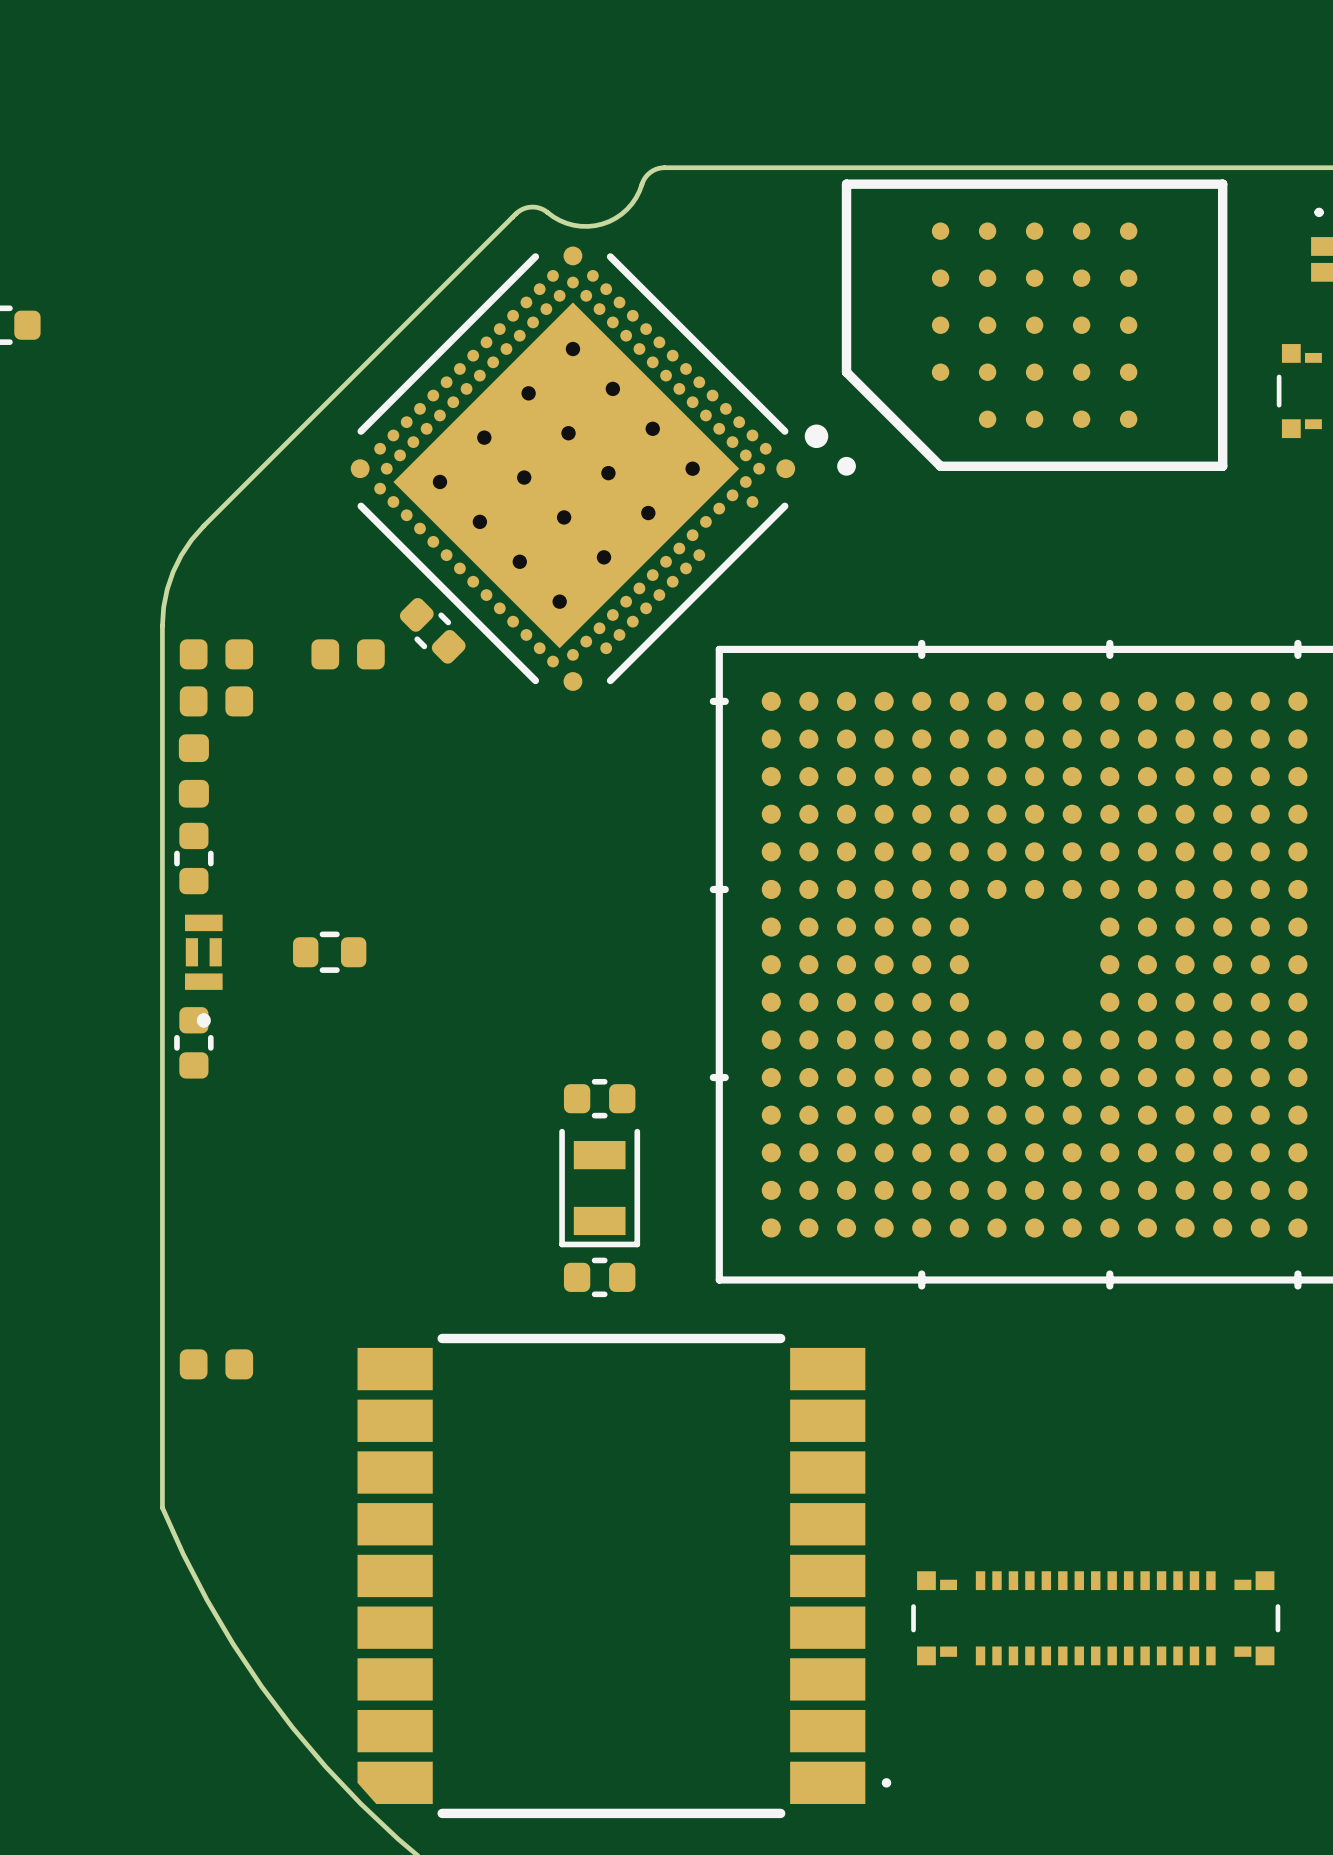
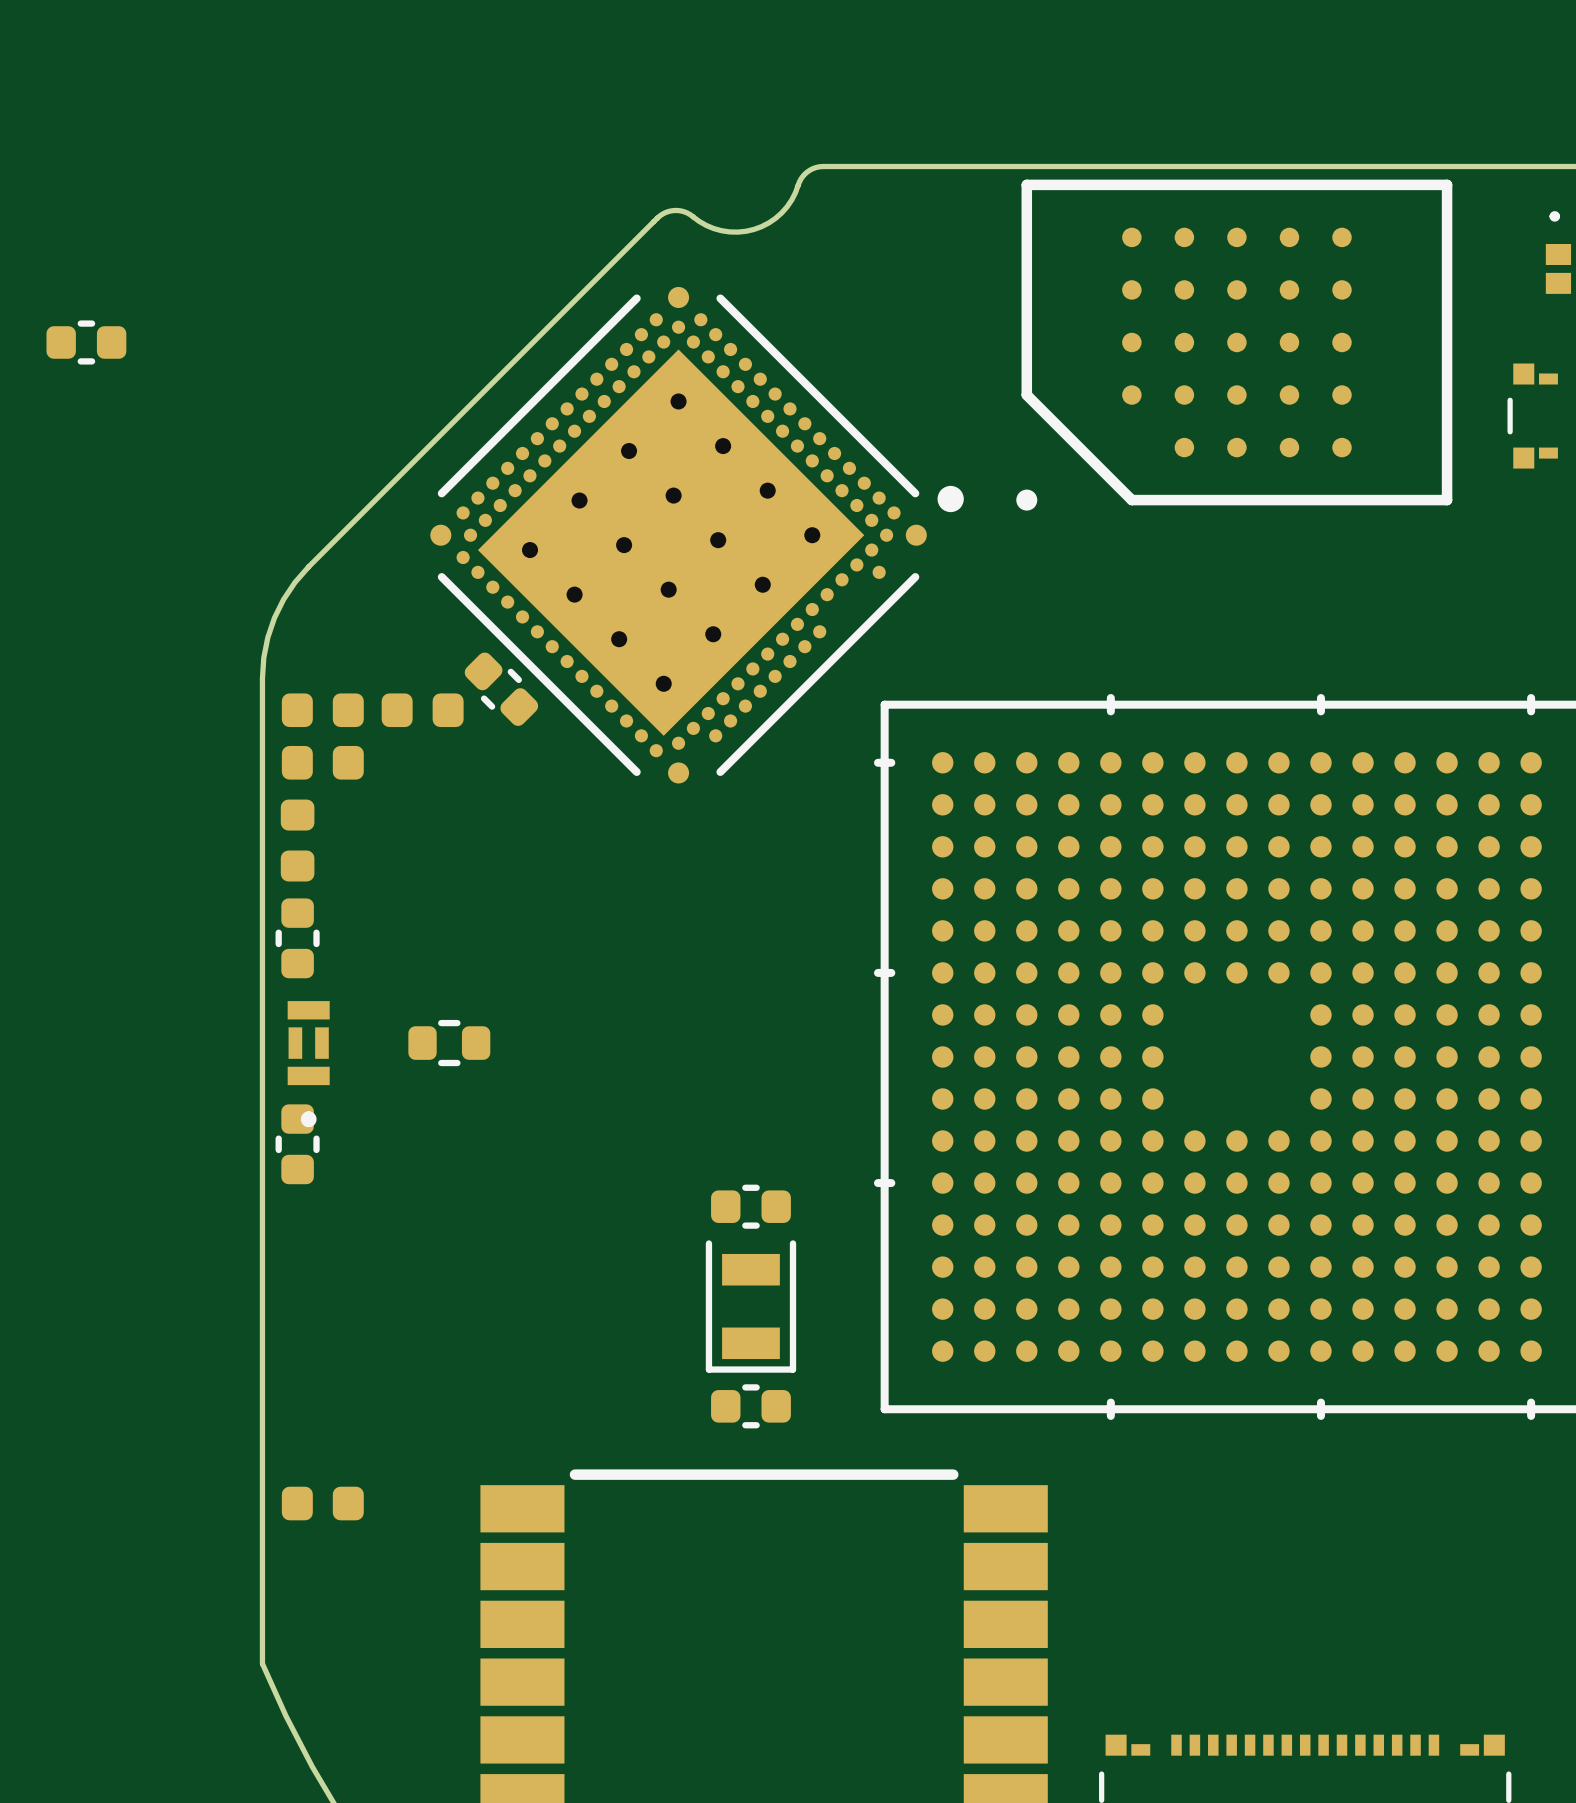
part position: (589, 468) -> (697, 535)
part position: (432, 630) -> (501, 689)
part position: (348, 654) -> (422, 710)

